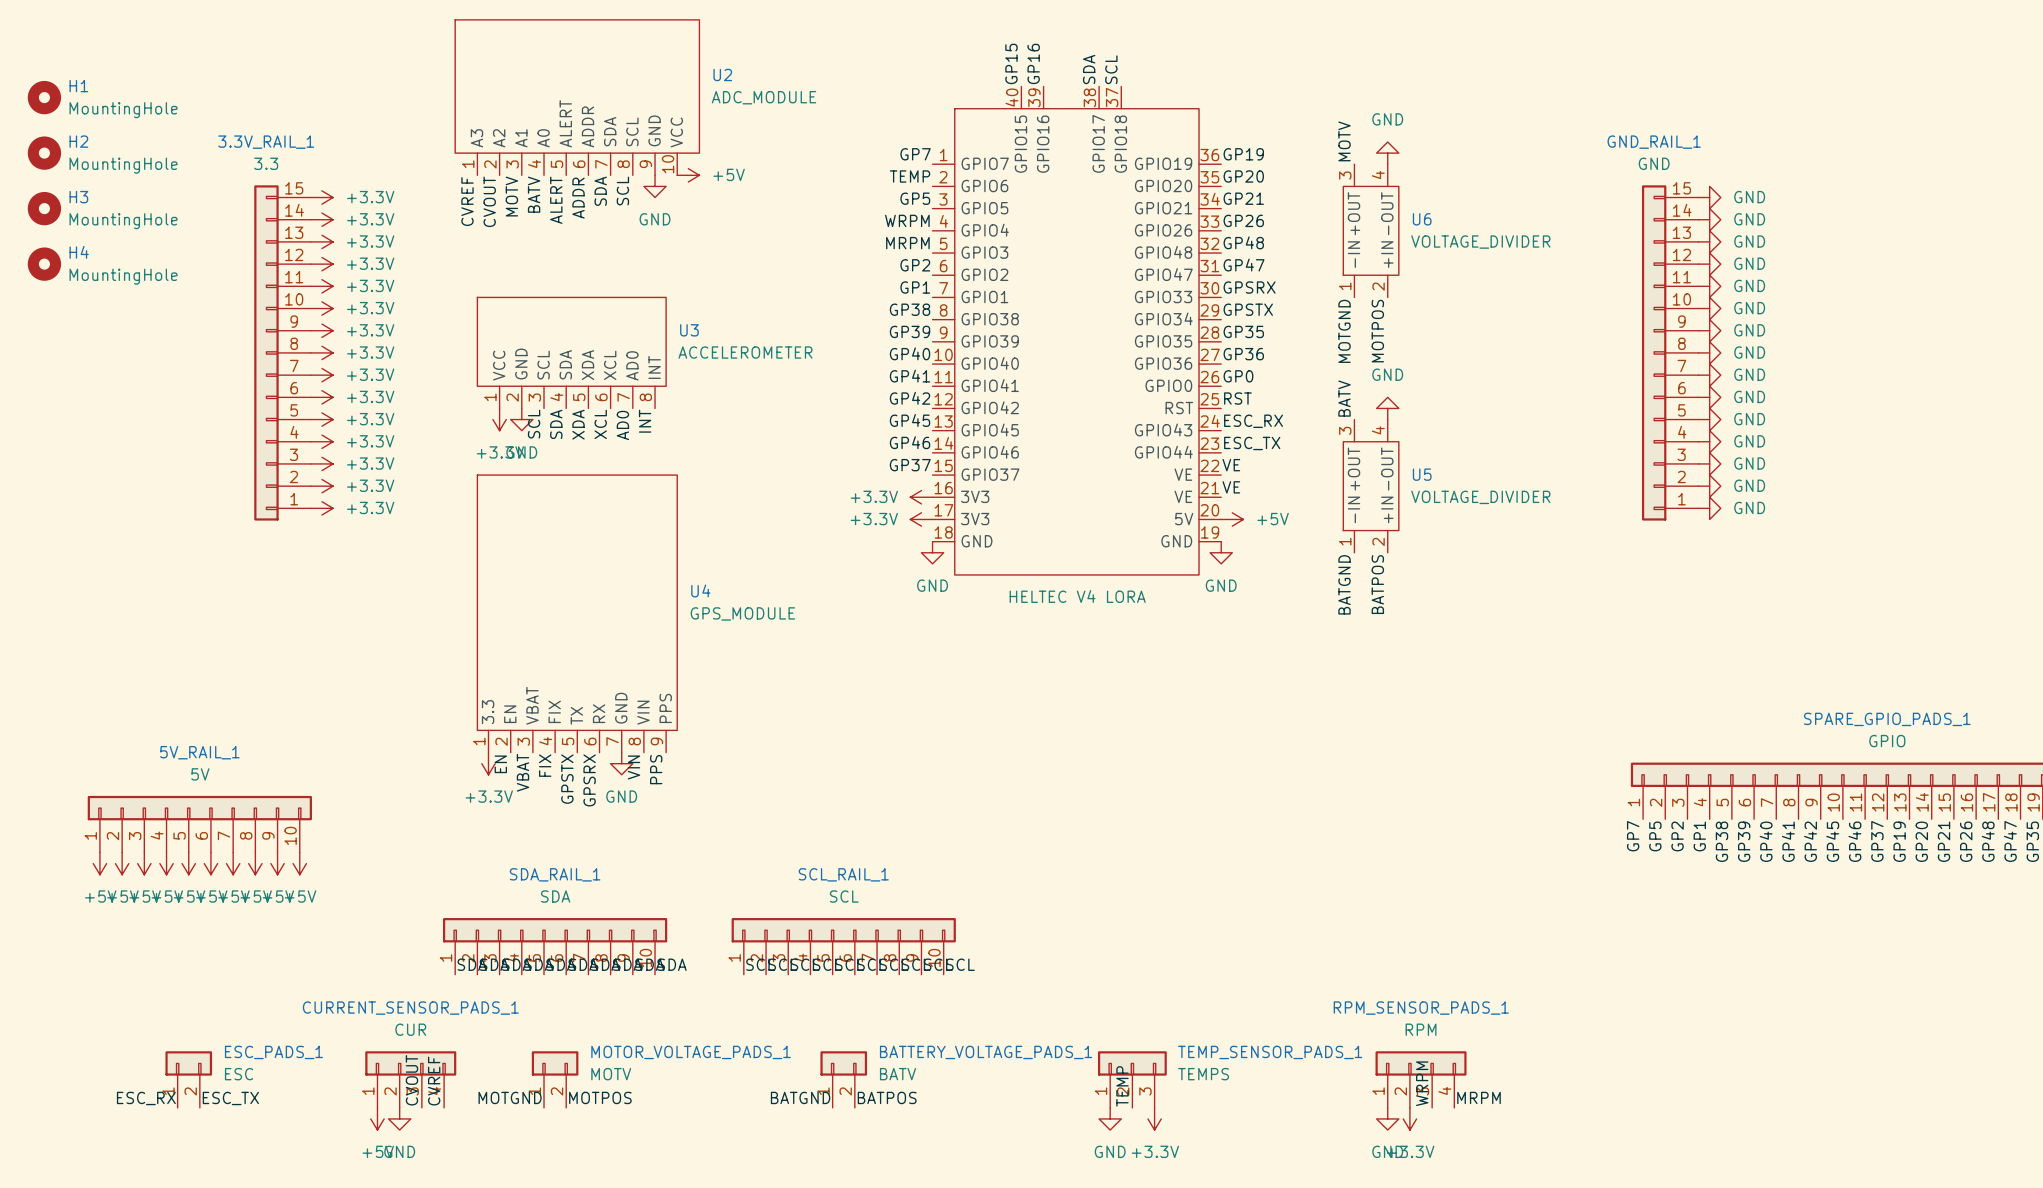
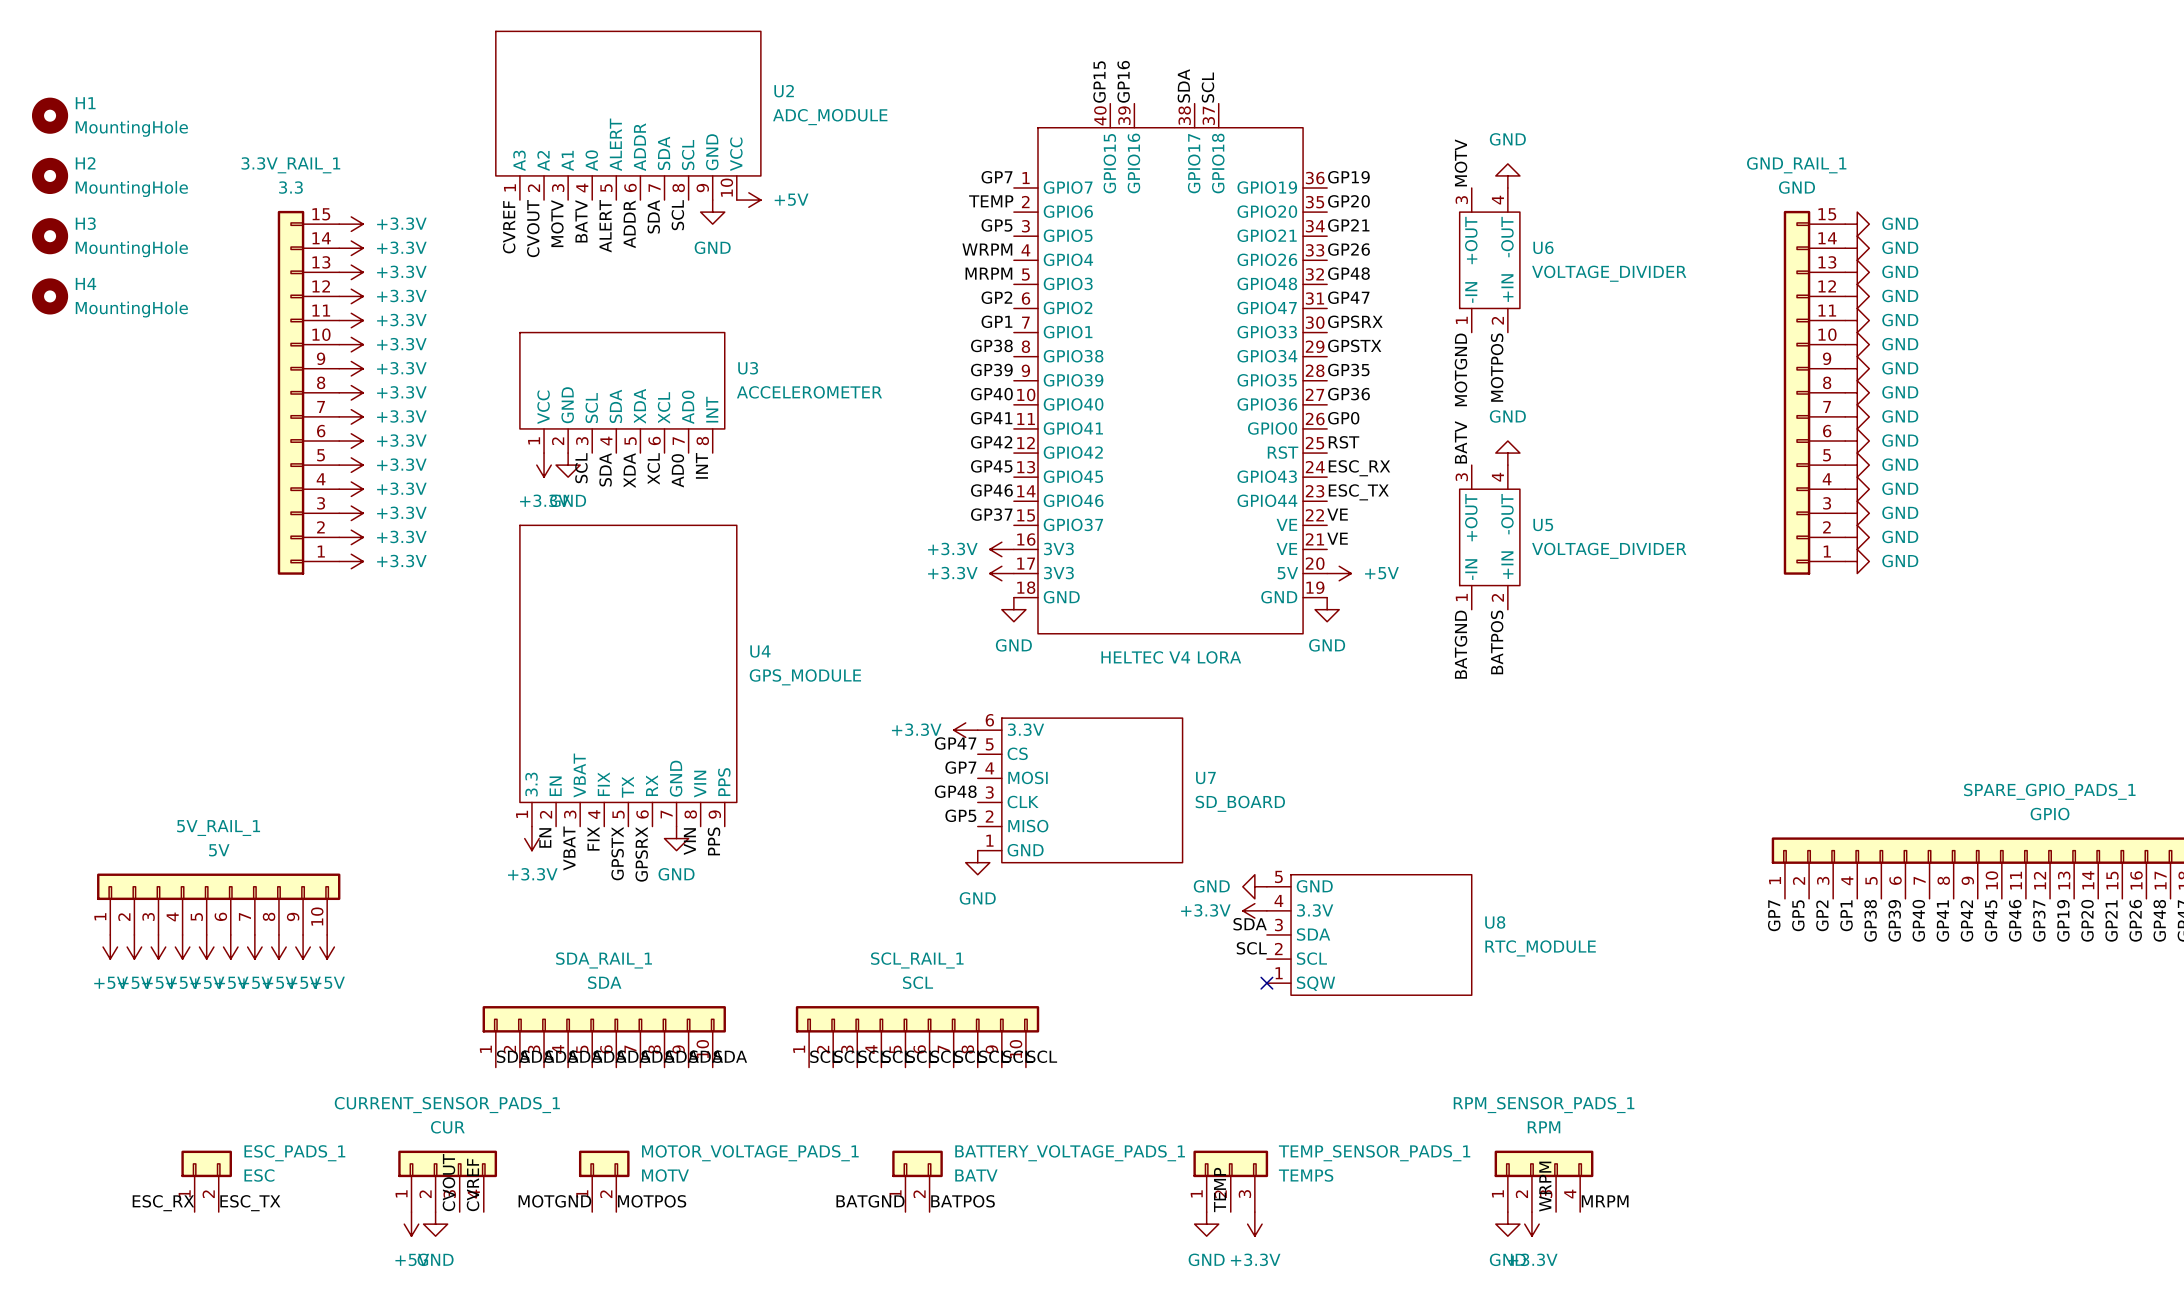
power symbol: none -> +3.3V (965, 730)
label: none -> GP47 (955, 743)
label: none -> GP7 (960, 767)
U7: none -> SD_BOARD (1080, 790)
label: none -> GP48 (955, 791)
label: none -> GP5 (960, 815)
power symbol: none -> GND (977, 862)
power symbol: none -> GND (1254, 886)
power symbol: none -> +3.3V (1254, 910)
label: none -> SDA (1250, 924)
U8: none -> RTC_MODULE (1369, 934)
label: none -> SCL (1251, 948)
no-connect mark: none -> (1266, 983)

